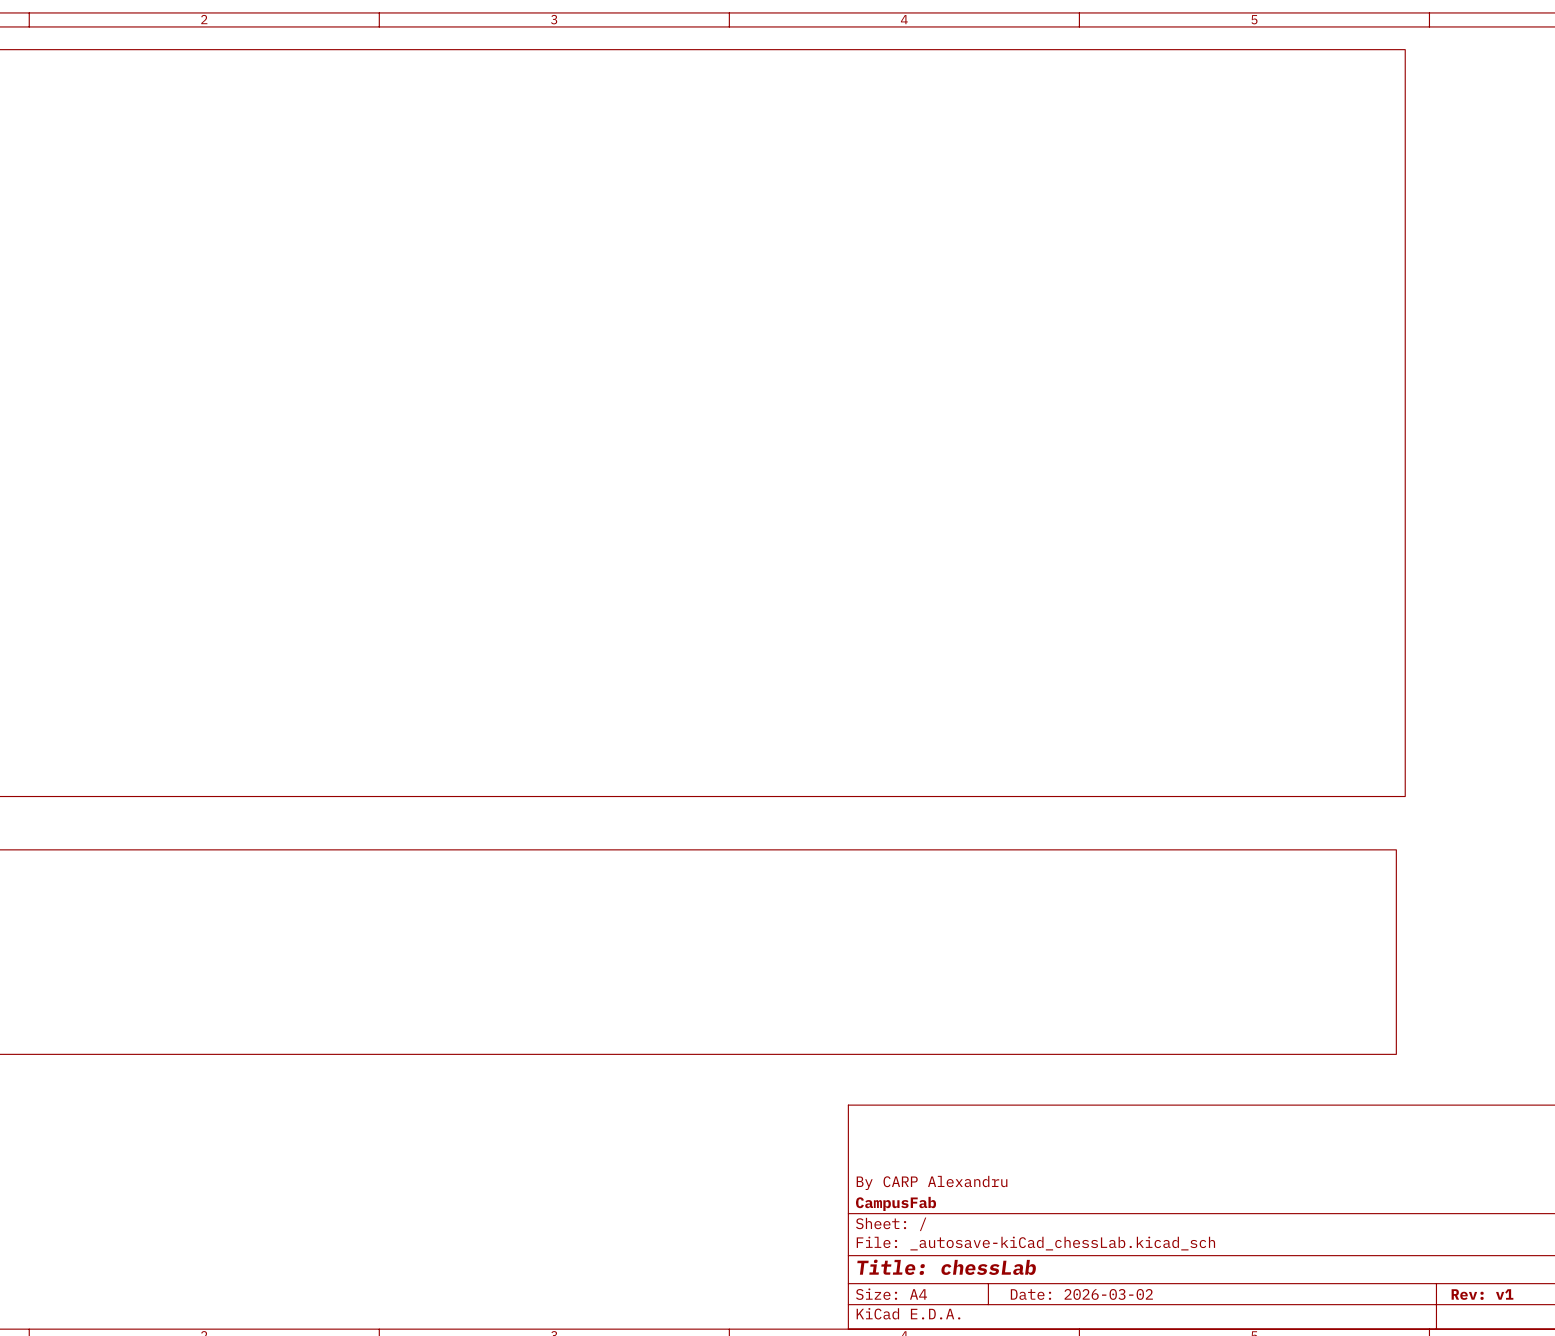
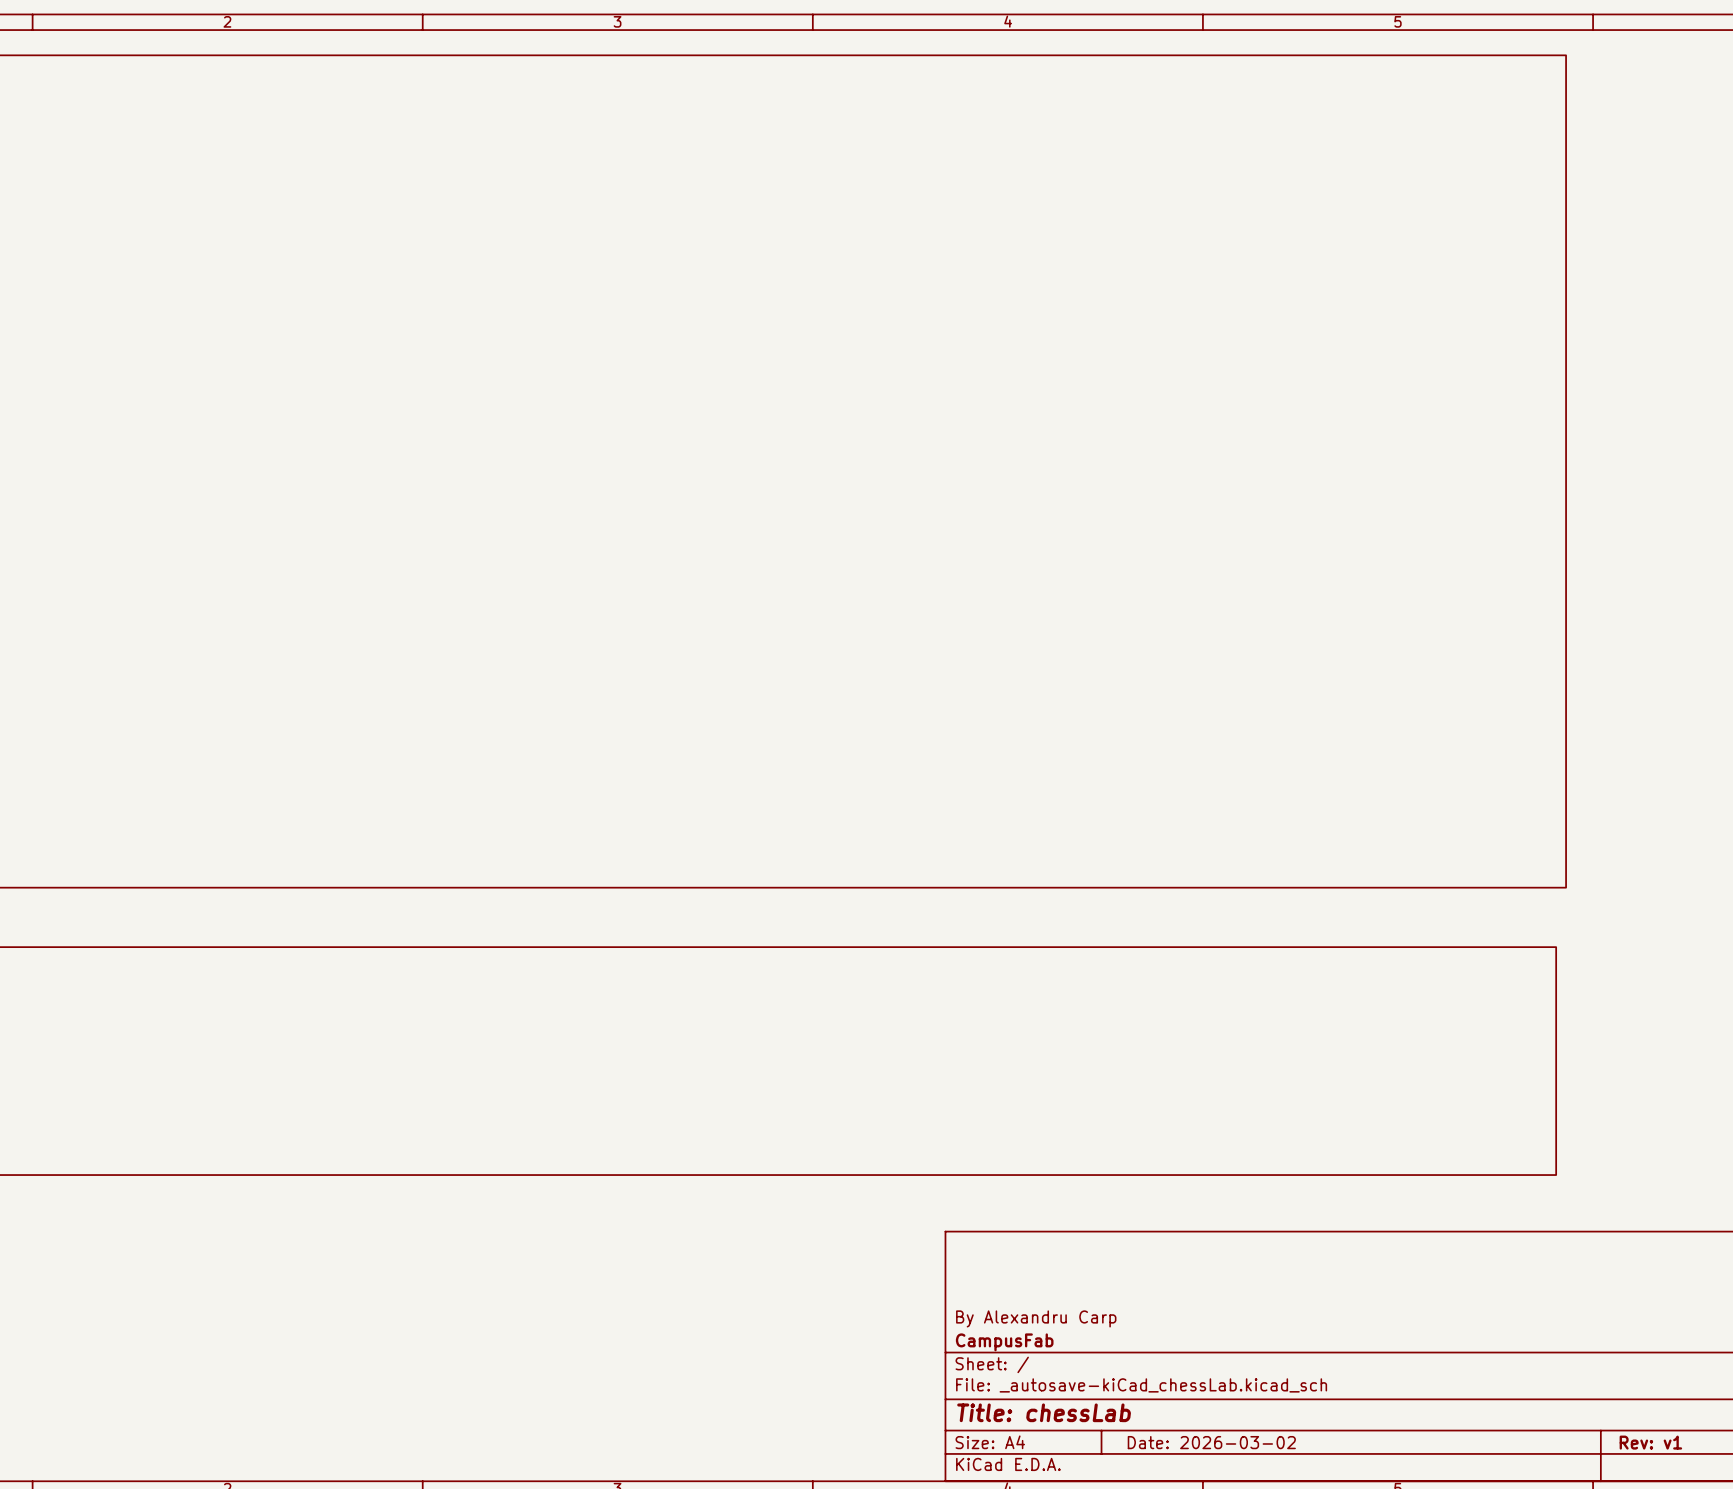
title block: By CARP Alexandru (932, 1182) -> By Alexandru Carp (1036, 1318)

